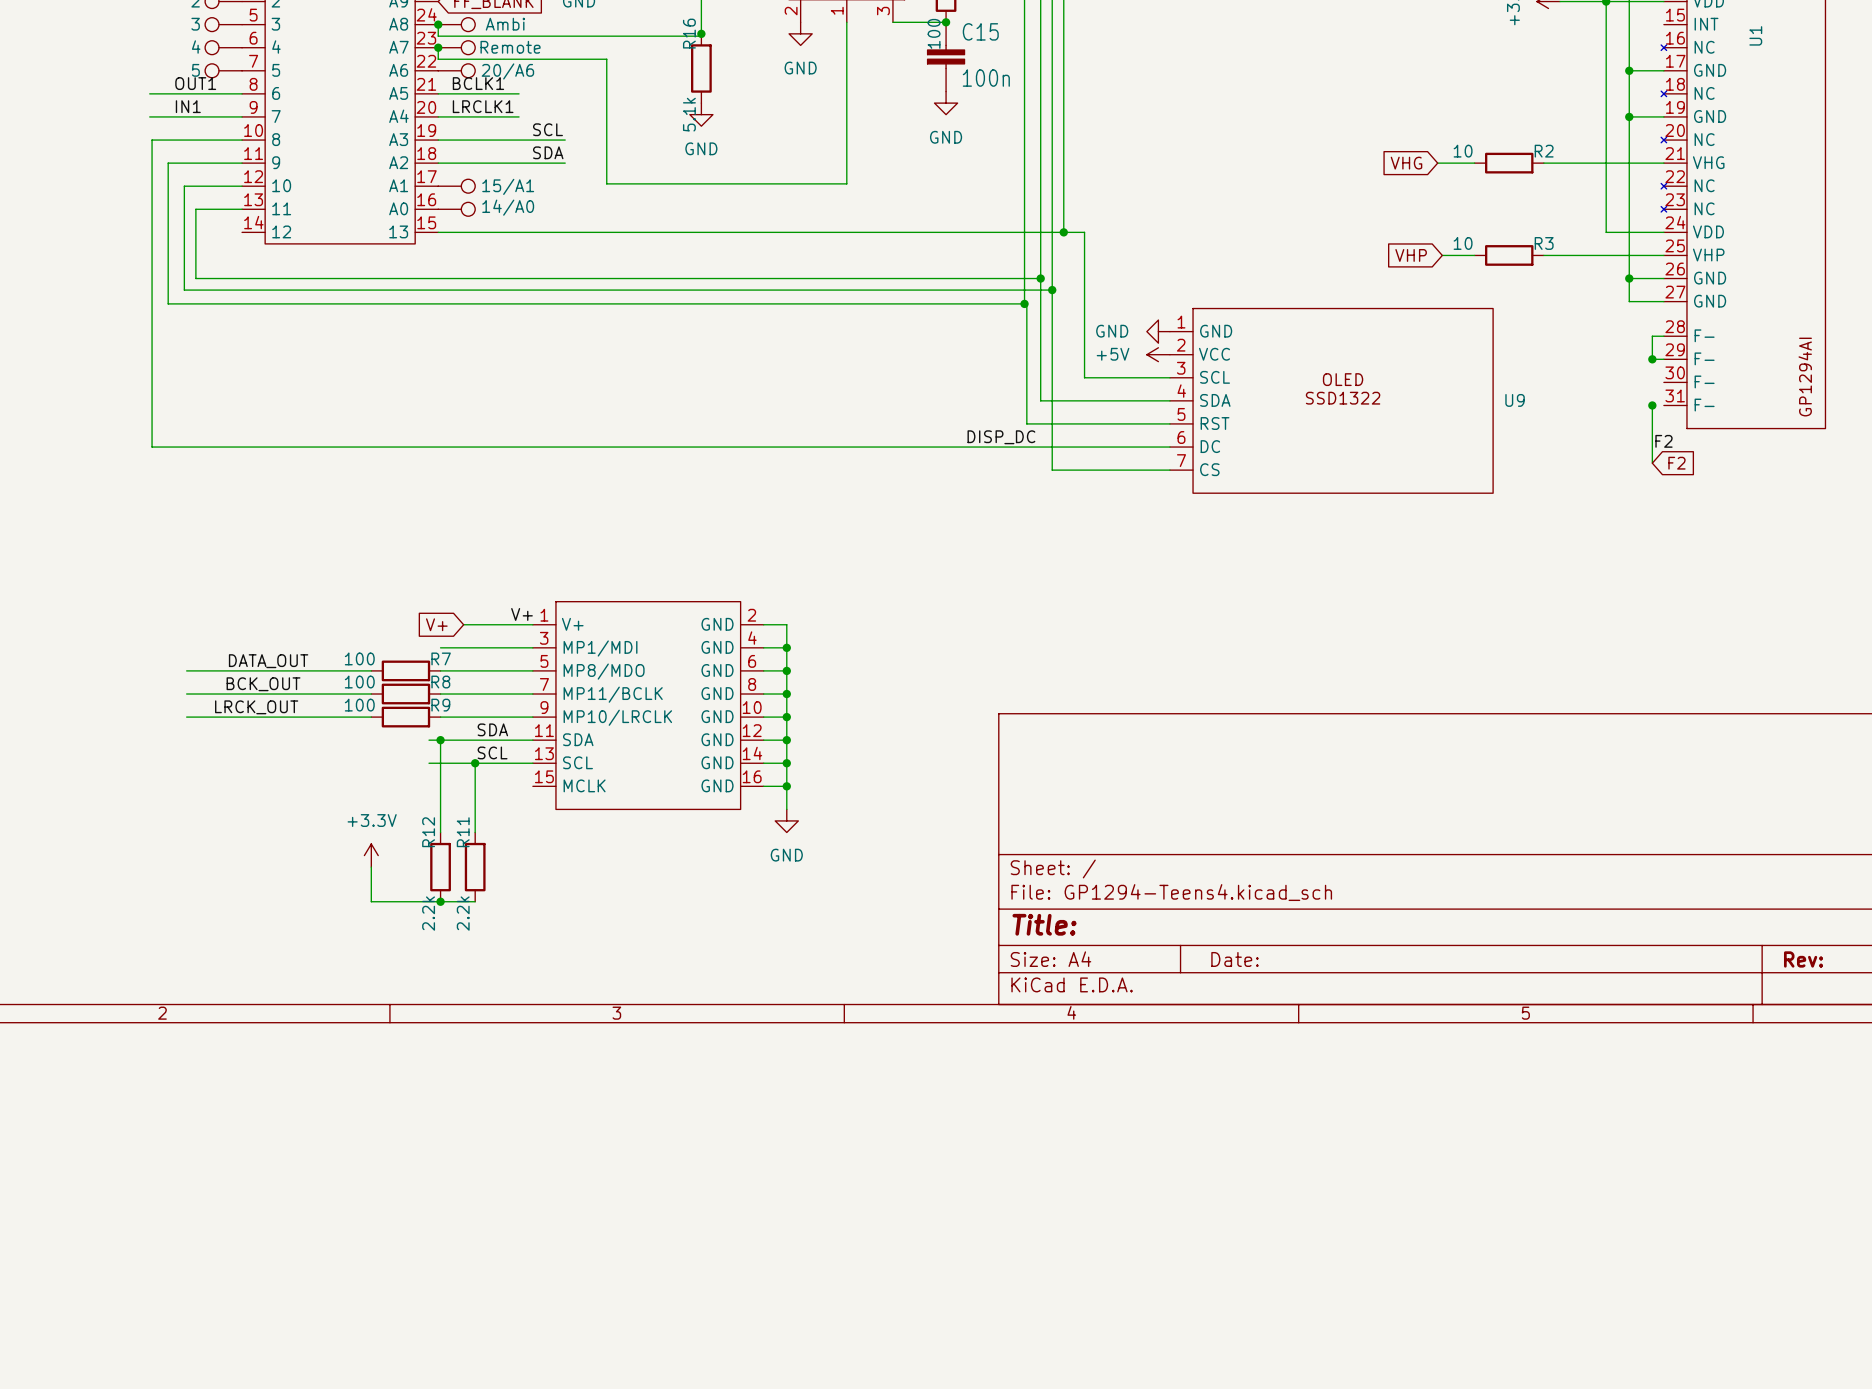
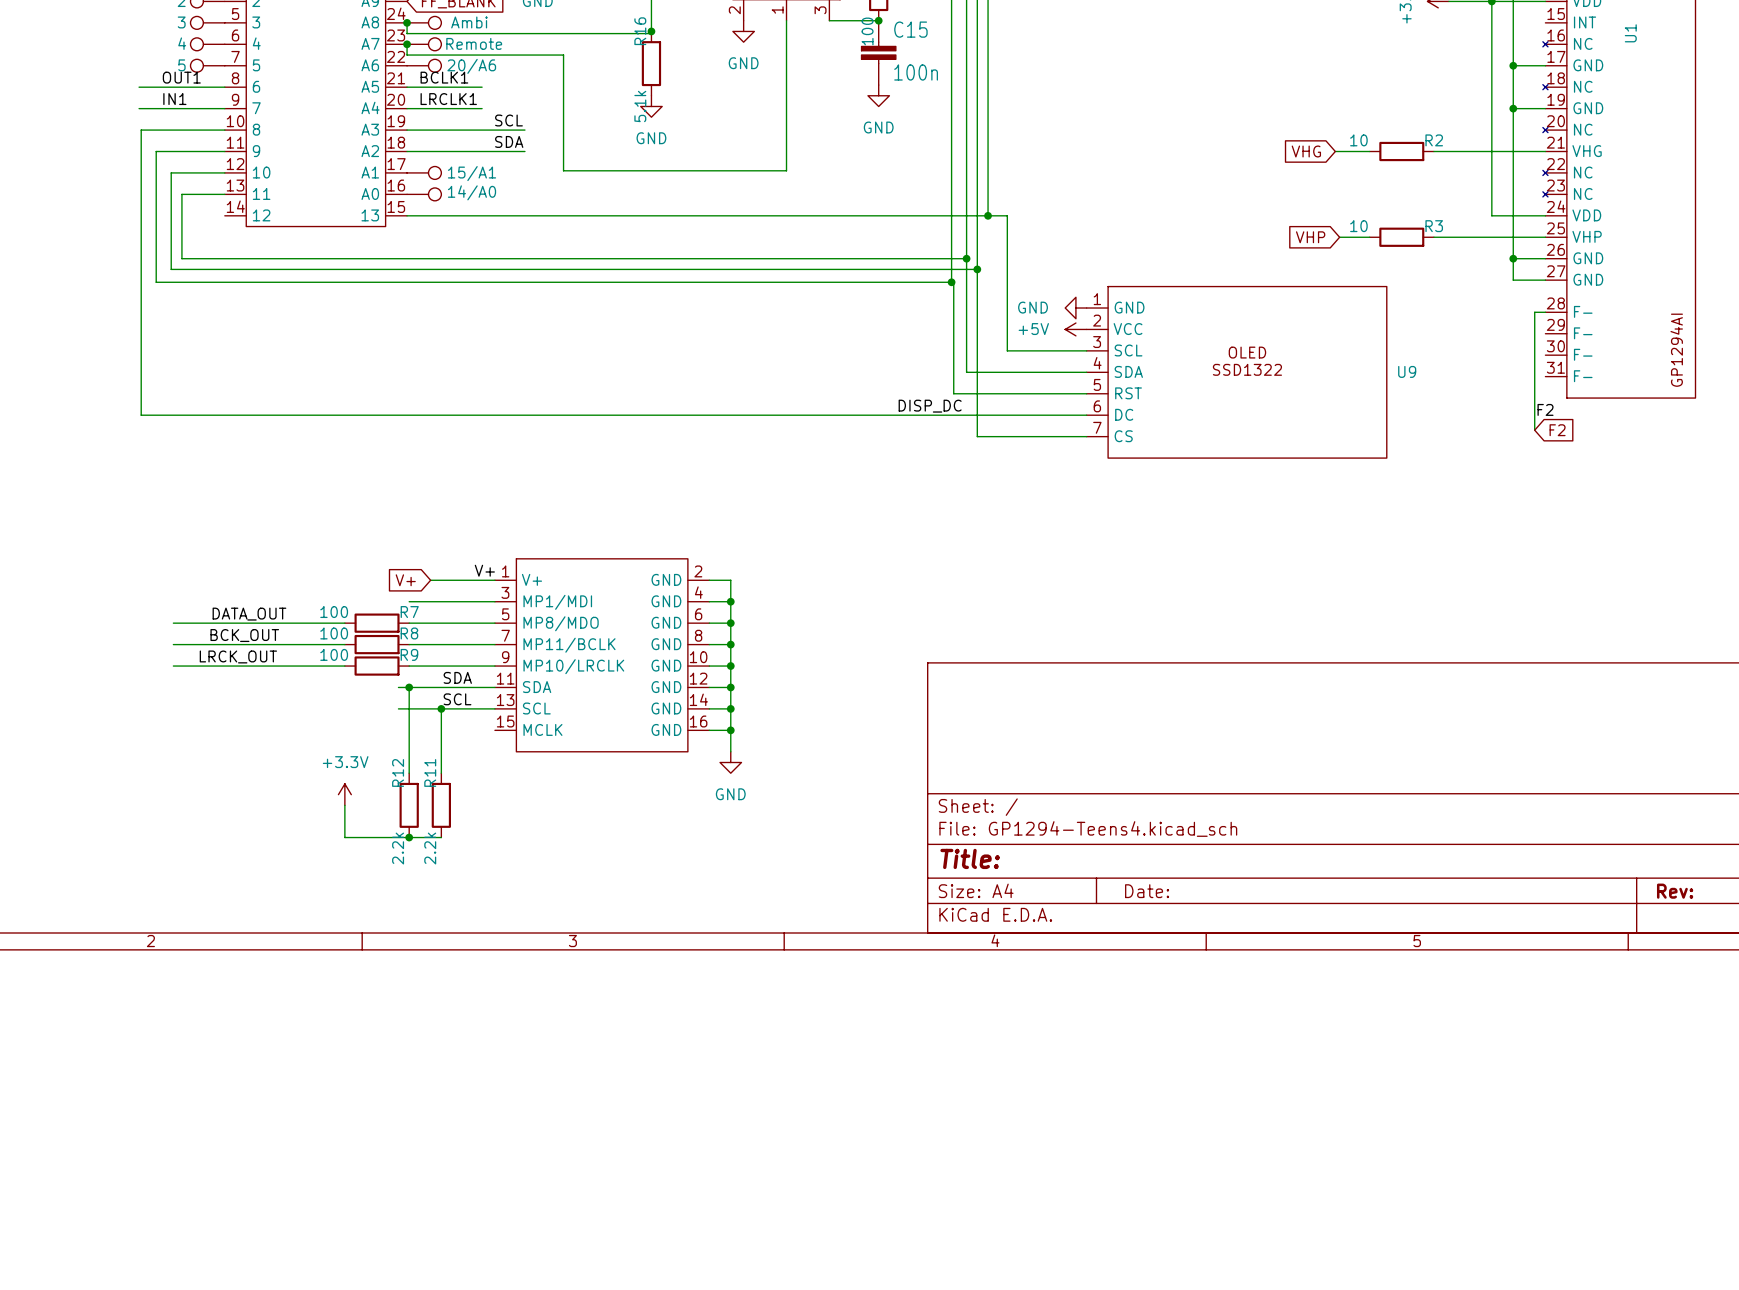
wire: (1652, 359) (1663, 359) -> (1534, 333) (1534, 376)
junction: (1652, 359) -> none
junction: (1652, 405) -> none

